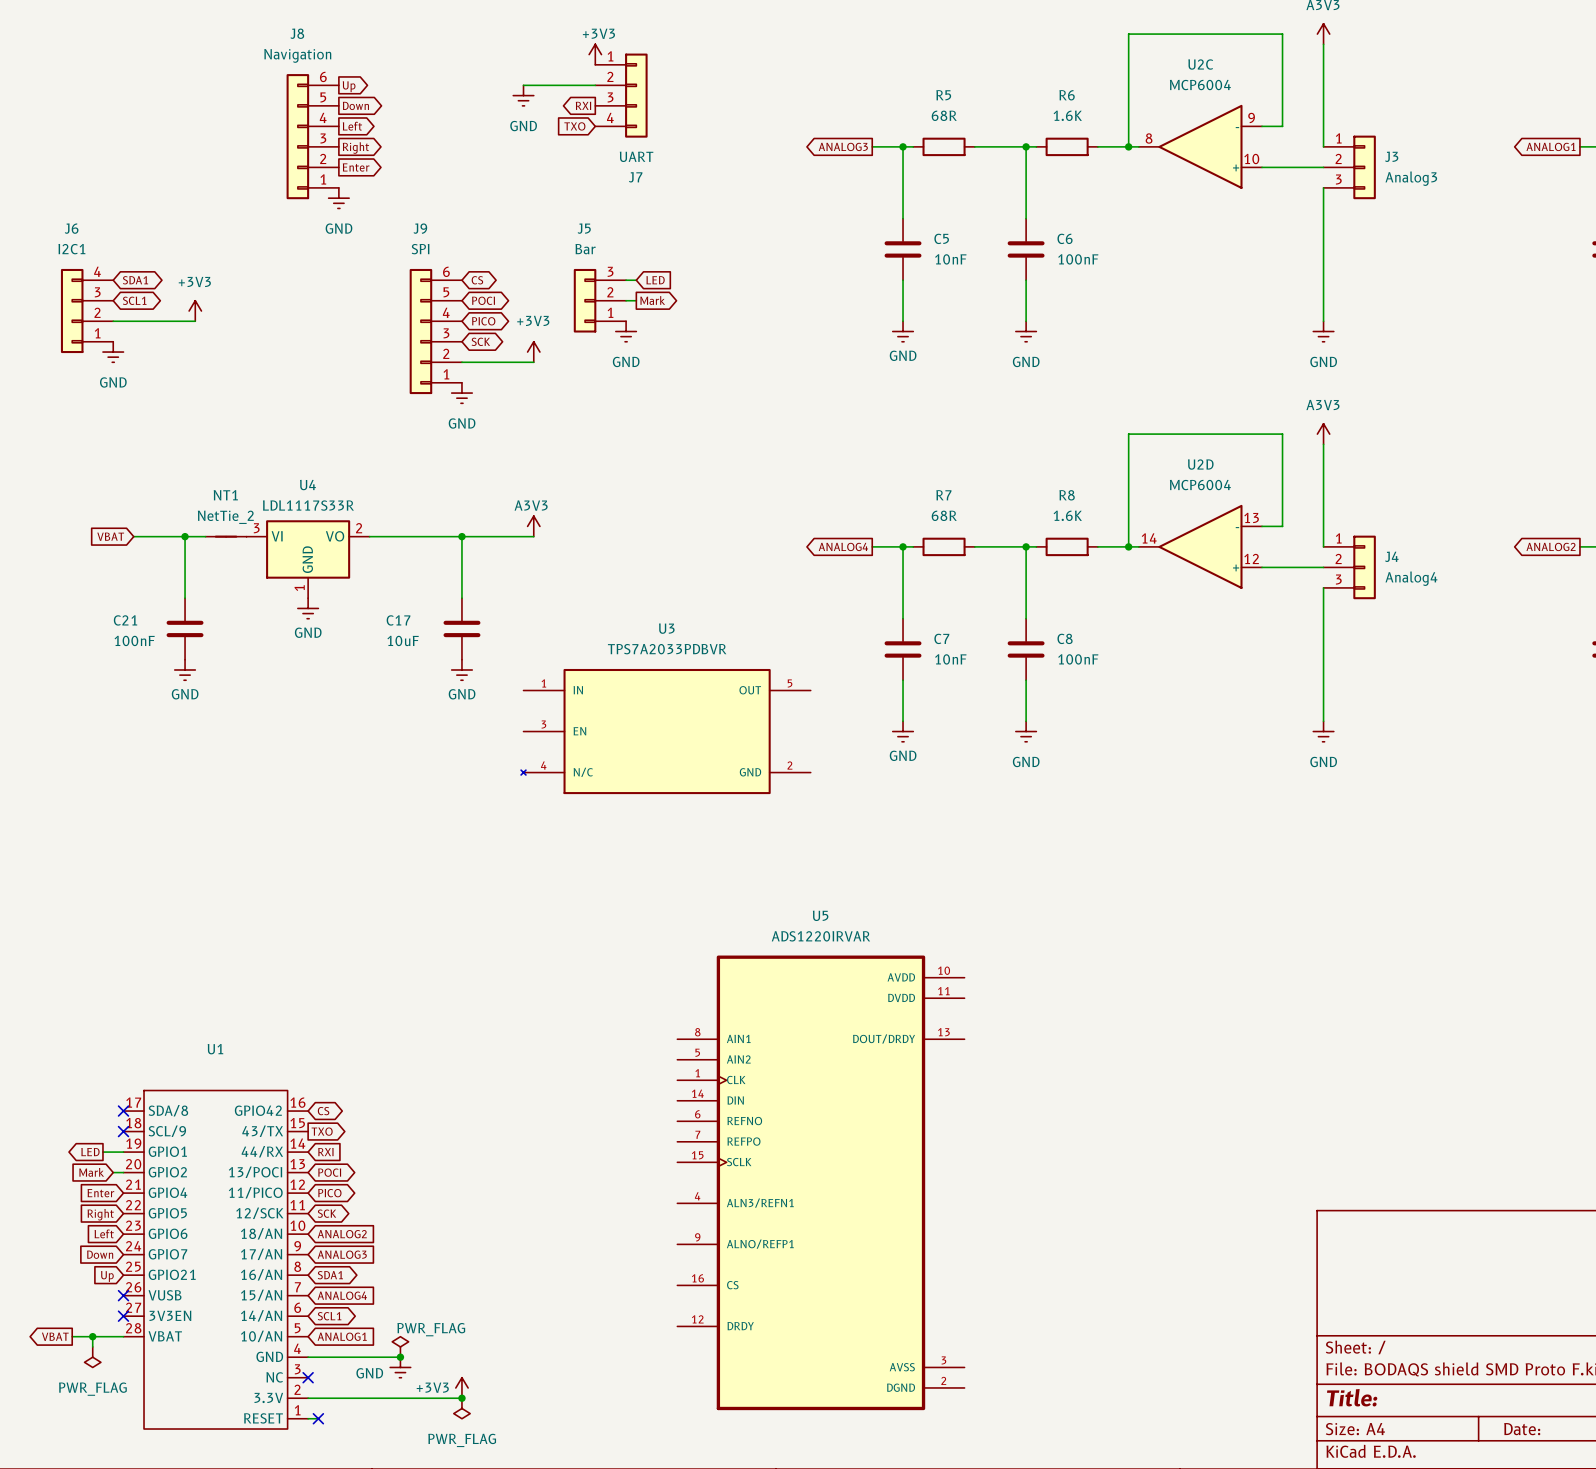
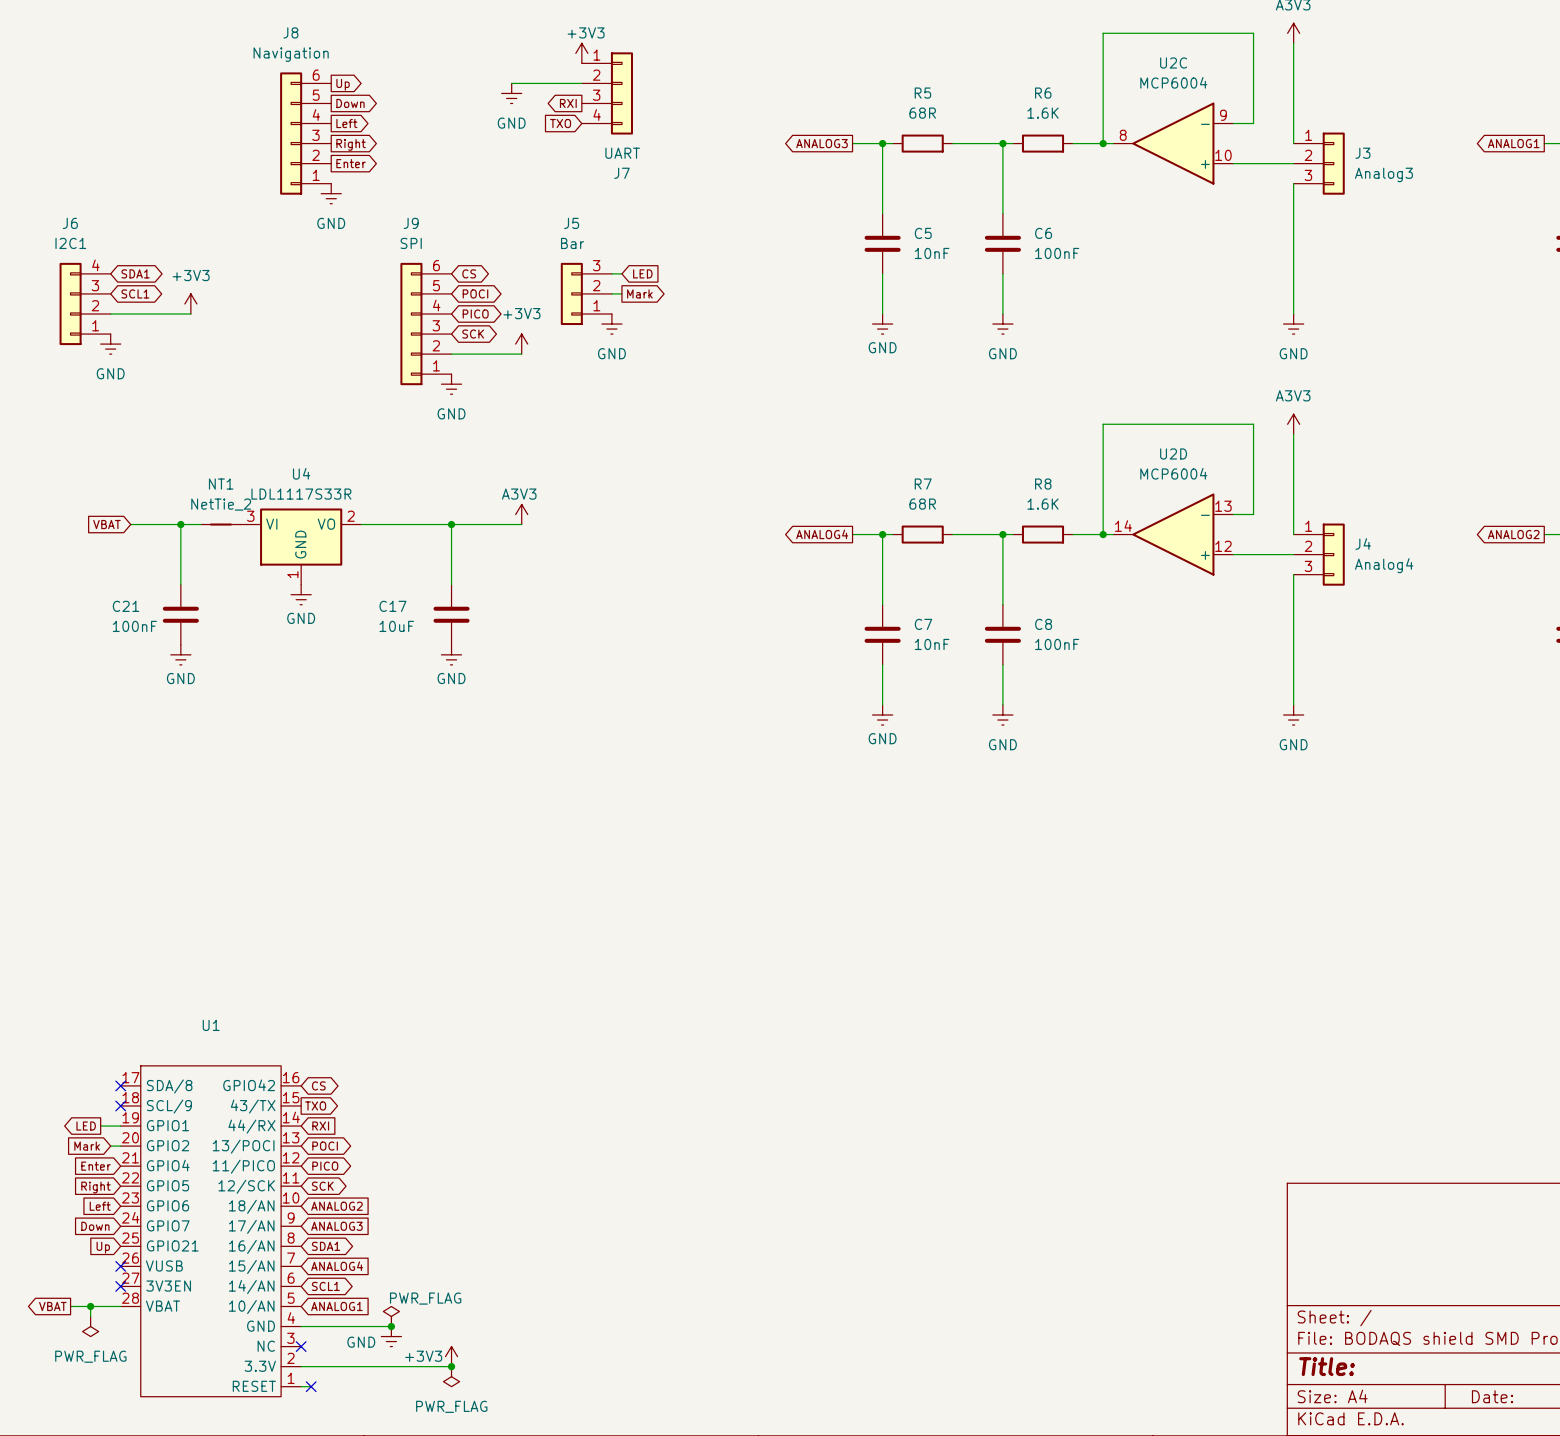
U3: TPS7A2033PDBVR (665, 731) -> none
U5: ADS1220IRVAR (820, 1182) -> none

